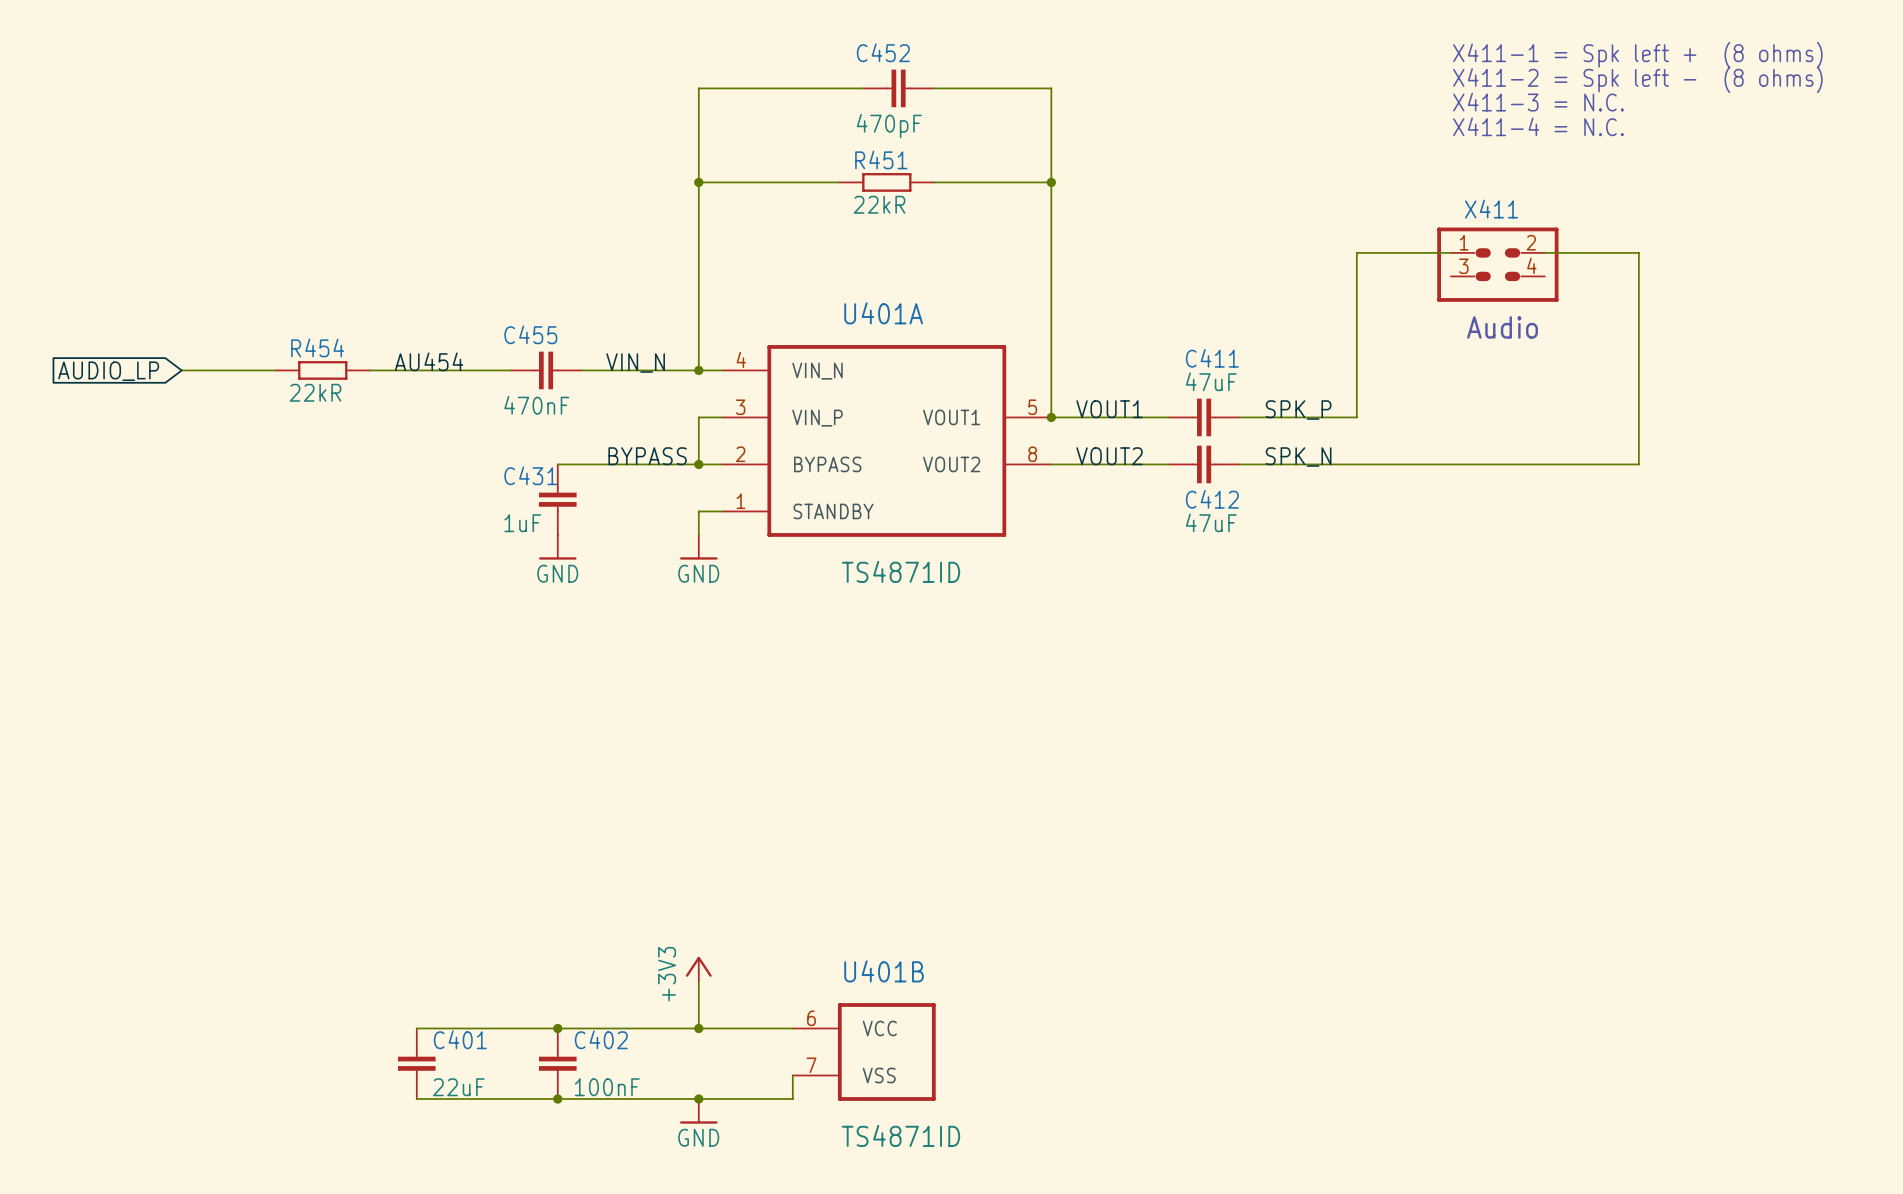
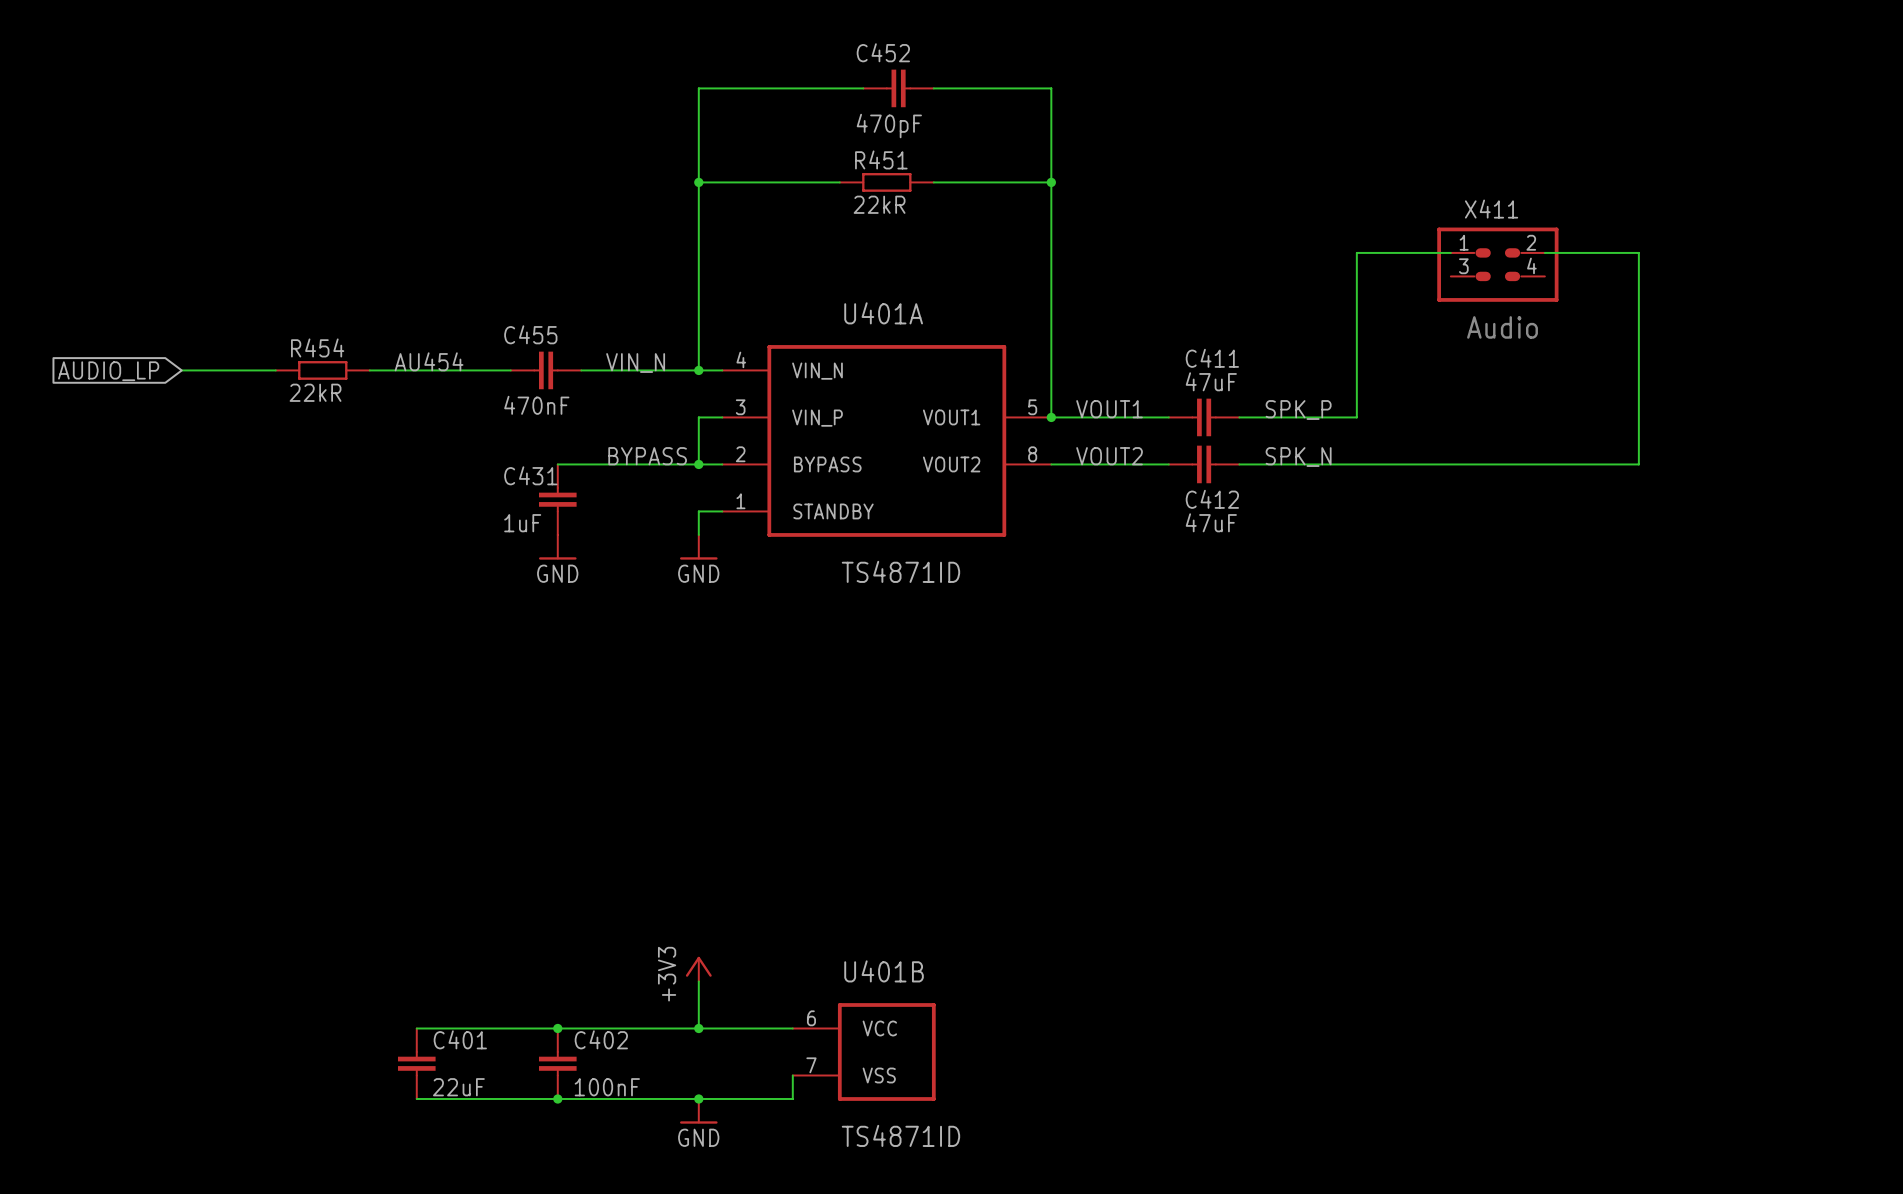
text: X411-1 = Spk left + (8 ohms) (1637, 55) -> none
text: X411-2 = Spk left - (8 ohms) (1637, 79) -> none
text: X411-3 = N.C. (1538, 102) -> none
text: X411-4 = N.C. (1538, 126) -> none

